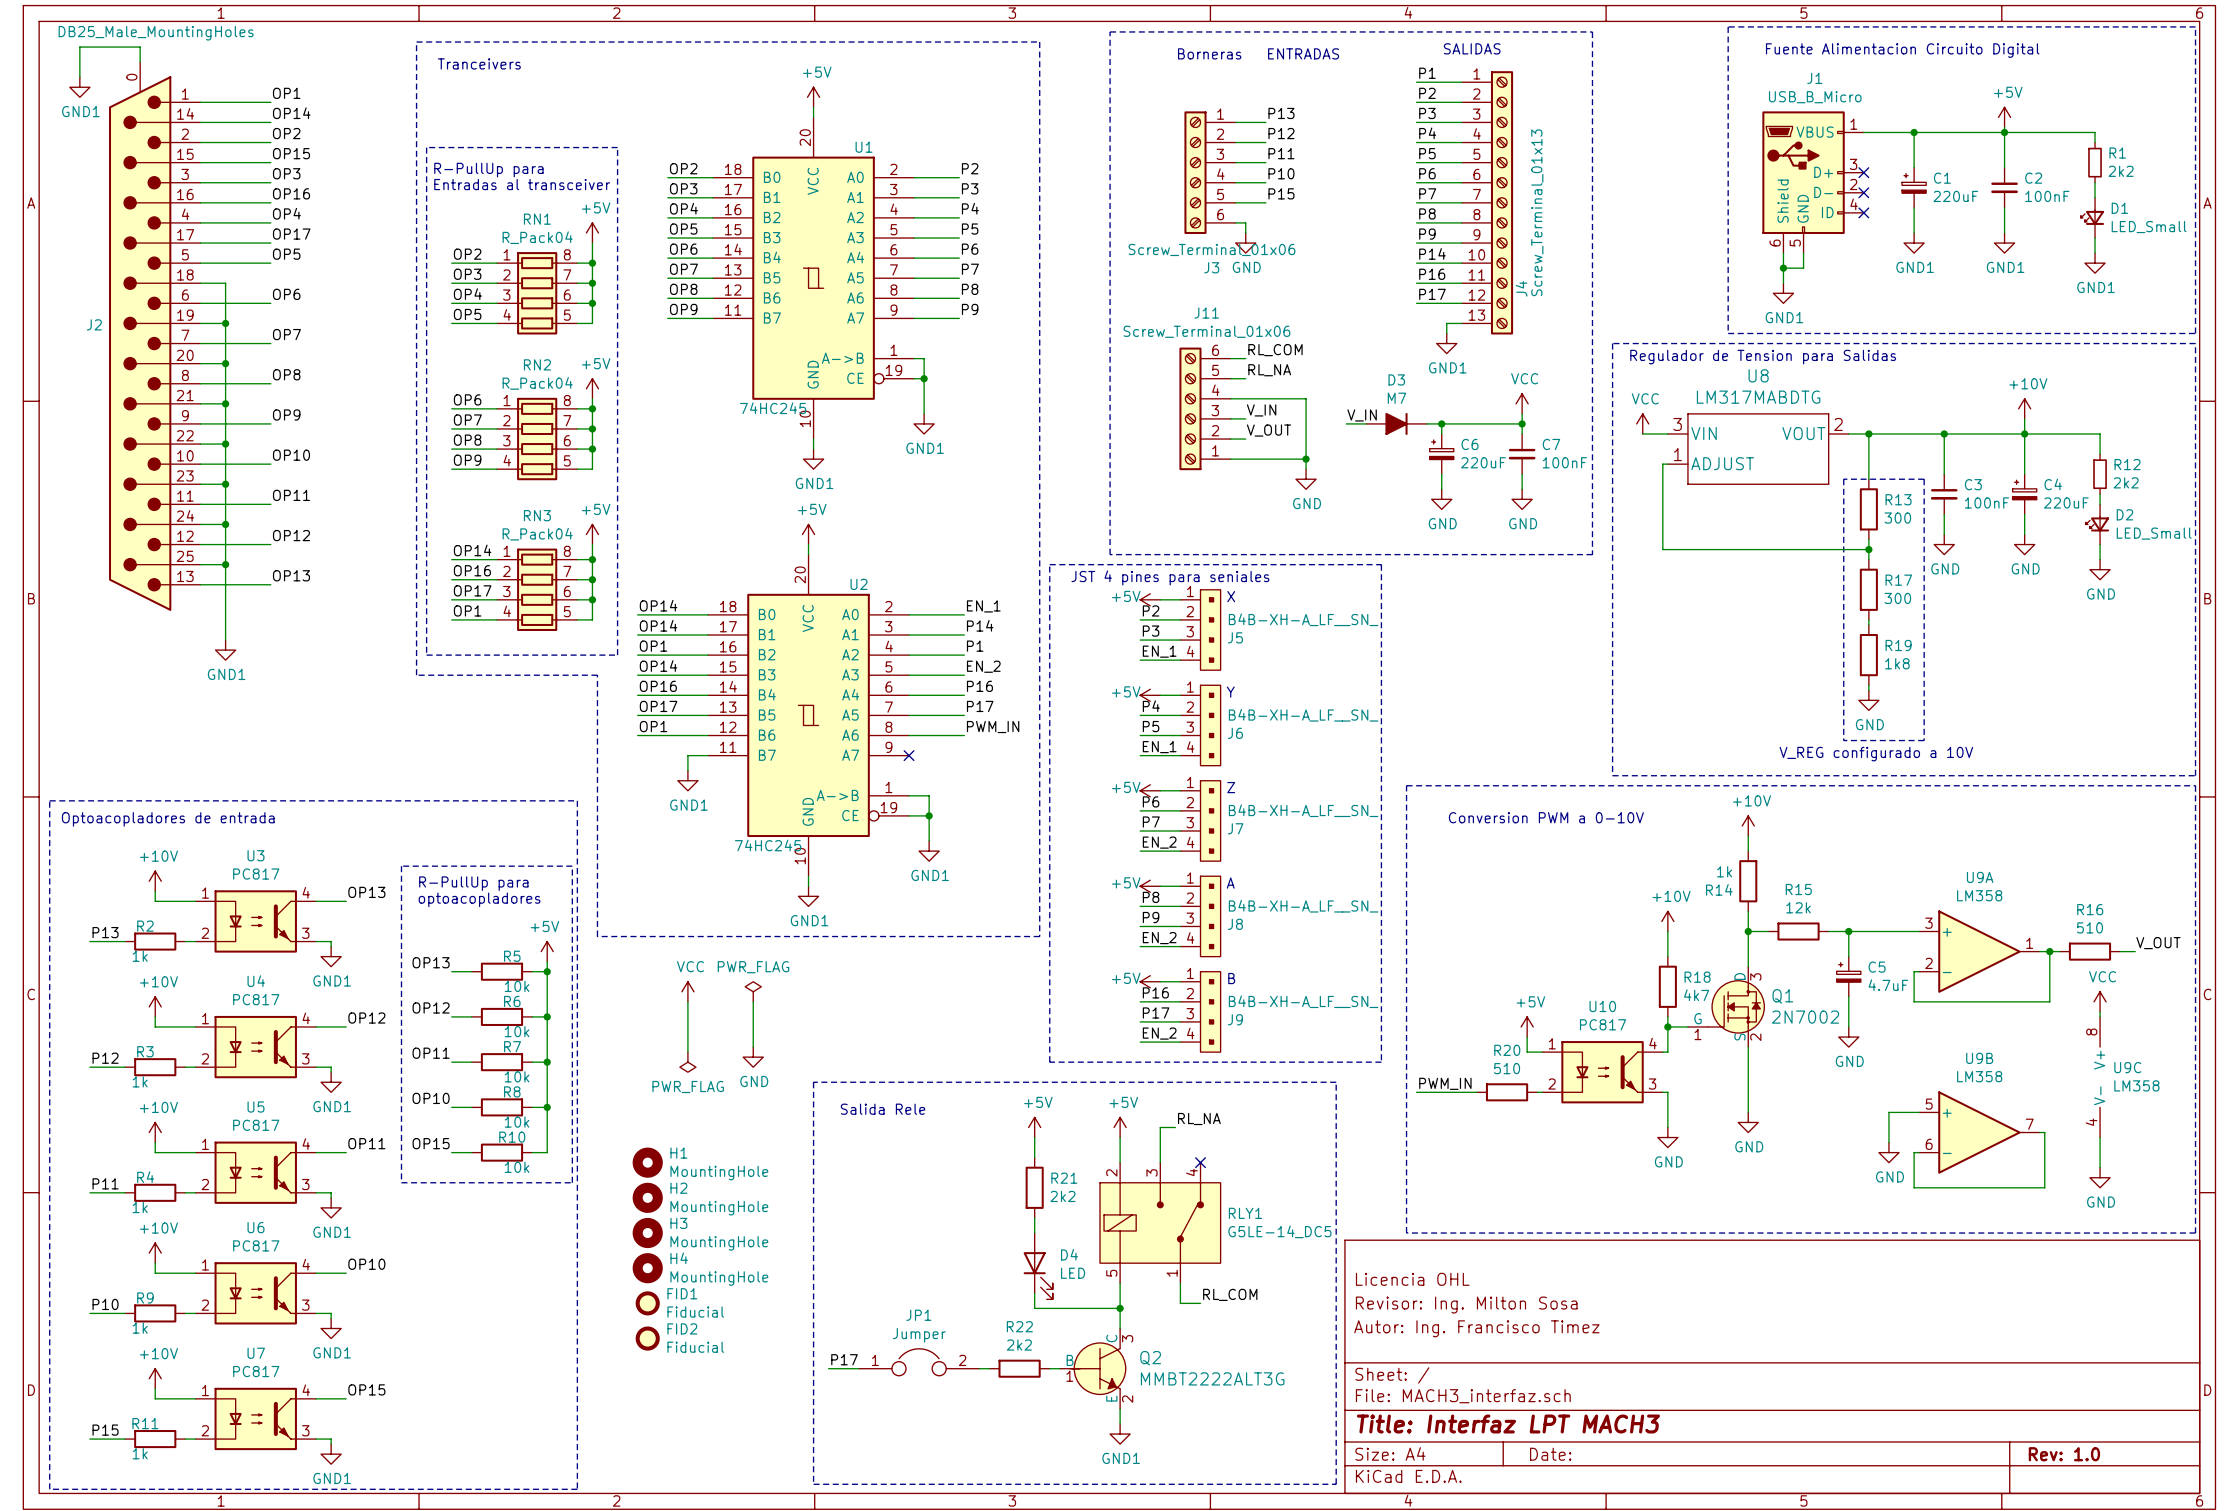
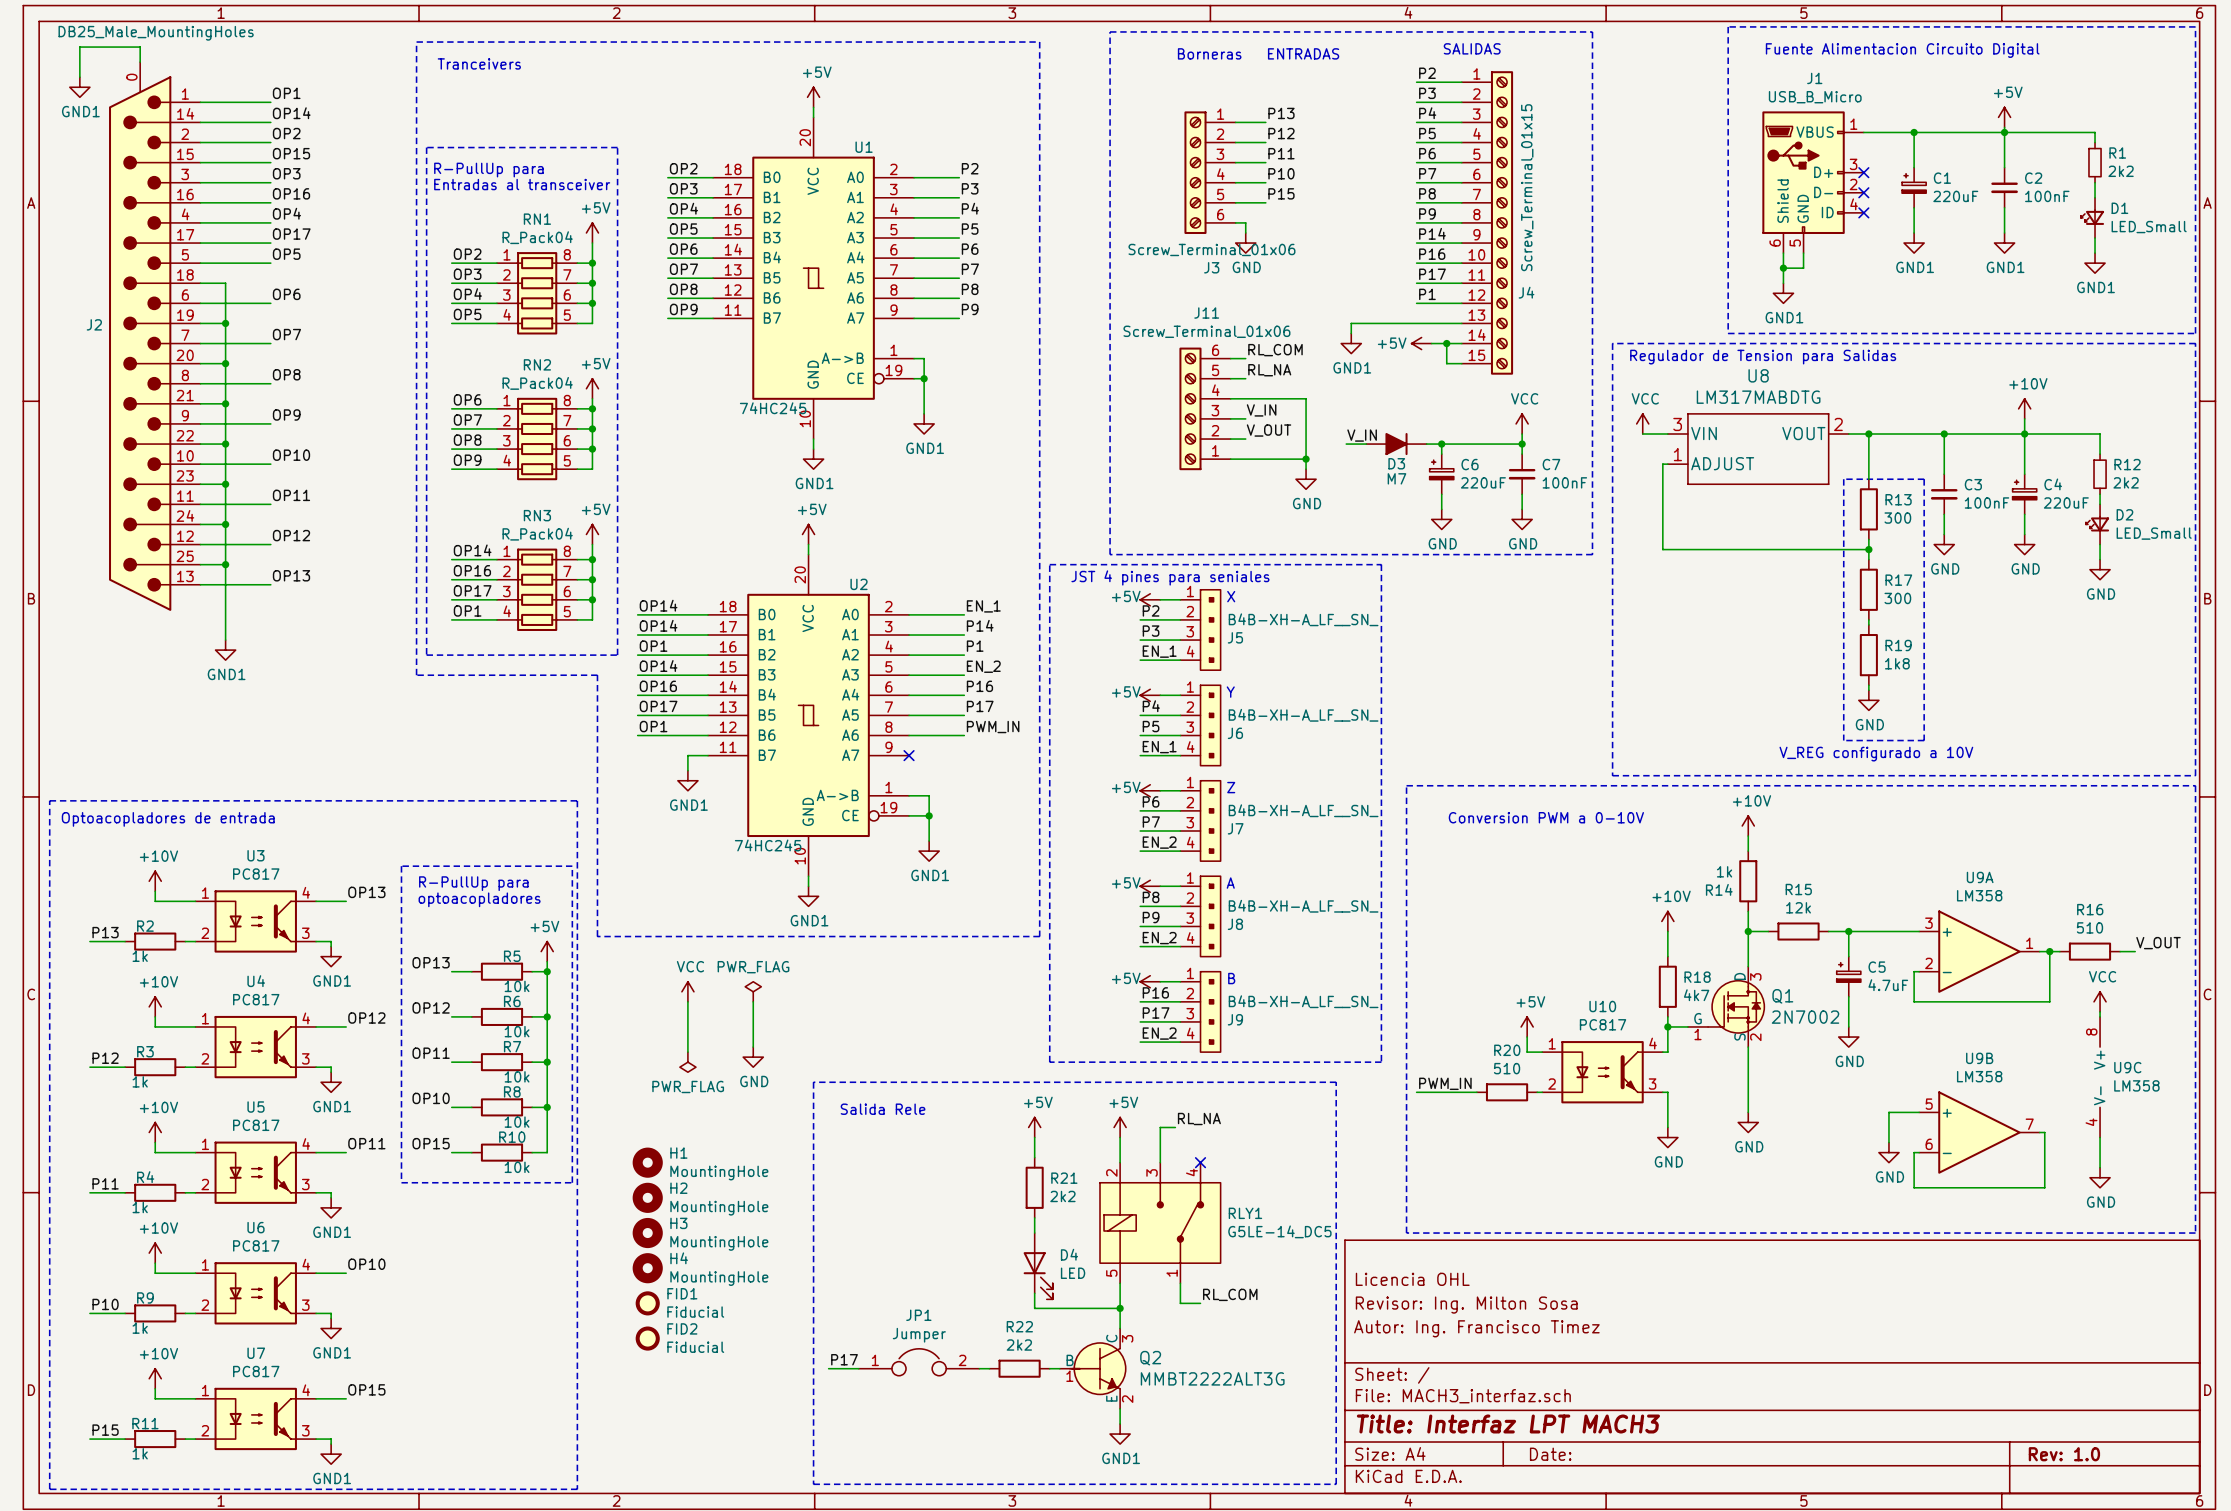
J4 symbol: [1461, 71, 1514, 335] -> [1461, 71, 1514, 375]
label: P1 (1427, 73) -> P2 (1427, 73)
label: P2 (1427, 93) -> P3 (1427, 93)
label: P3 (1427, 113) -> P4 (1427, 113)
label: P4 (1427, 133) -> P5 (1427, 133)
label: P5 (1427, 153) -> P6 (1427, 153)
label: P6 (1427, 173) -> P7 (1427, 173)
label: P7 (1427, 193) -> P8 (1427, 193)
J4 value: Screw_Terminal_01x13 (1537, 212) -> Screw_Terminal_01x15 (1527, 187)
label: P8 (1427, 213) -> P9 (1427, 213)
label: P9 (1427, 234) -> P14 (1432, 233)
label: P14 (1432, 253) -> P16 (1432, 254)
label: P16 (1432, 274) -> P17 (1432, 274)
label: P17 (1432, 294) -> P1 (1427, 294)
wire: (1446, 323) (1446, 333) -> (1446, 323) (1351, 323) (1351, 333)
power symbol: none -> +5V (1421, 343)
wire: none -> (1446, 343) (1446, 363) (1461, 363)
power symbol position: GND1 (1446, 343) -> GND1 (1351, 343)
junction: none -> (1446, 343)
D3 name position: D3 (1396, 379) -> D3 (1396, 463)
D3 value position: M7 (1396, 398) -> M7 (1396, 478)
power symbol position: VCC (1522, 403) -> VCC (1522, 423)
label position: V_IN (1362, 415) -> V_IN (1362, 435)
wire: (1346, 423) (1366, 423) -> (1346, 444) (1366, 444)
D3 position: (1396, 423) -> (1396, 444)
wire: (1426, 423) (1522, 423) -> (1426, 444) (1522, 444)
junction position: (1441, 423) -> (1441, 444)
junction position: (1522, 423) -> (1522, 444)
C6 position: (1441, 454) -> (1441, 474)
C7 position: (1522, 454) -> (1522, 474)
power symbol position: GND (1441, 499) -> GND (1441, 519)
power symbol position: GND (1522, 499) -> GND (1522, 519)

